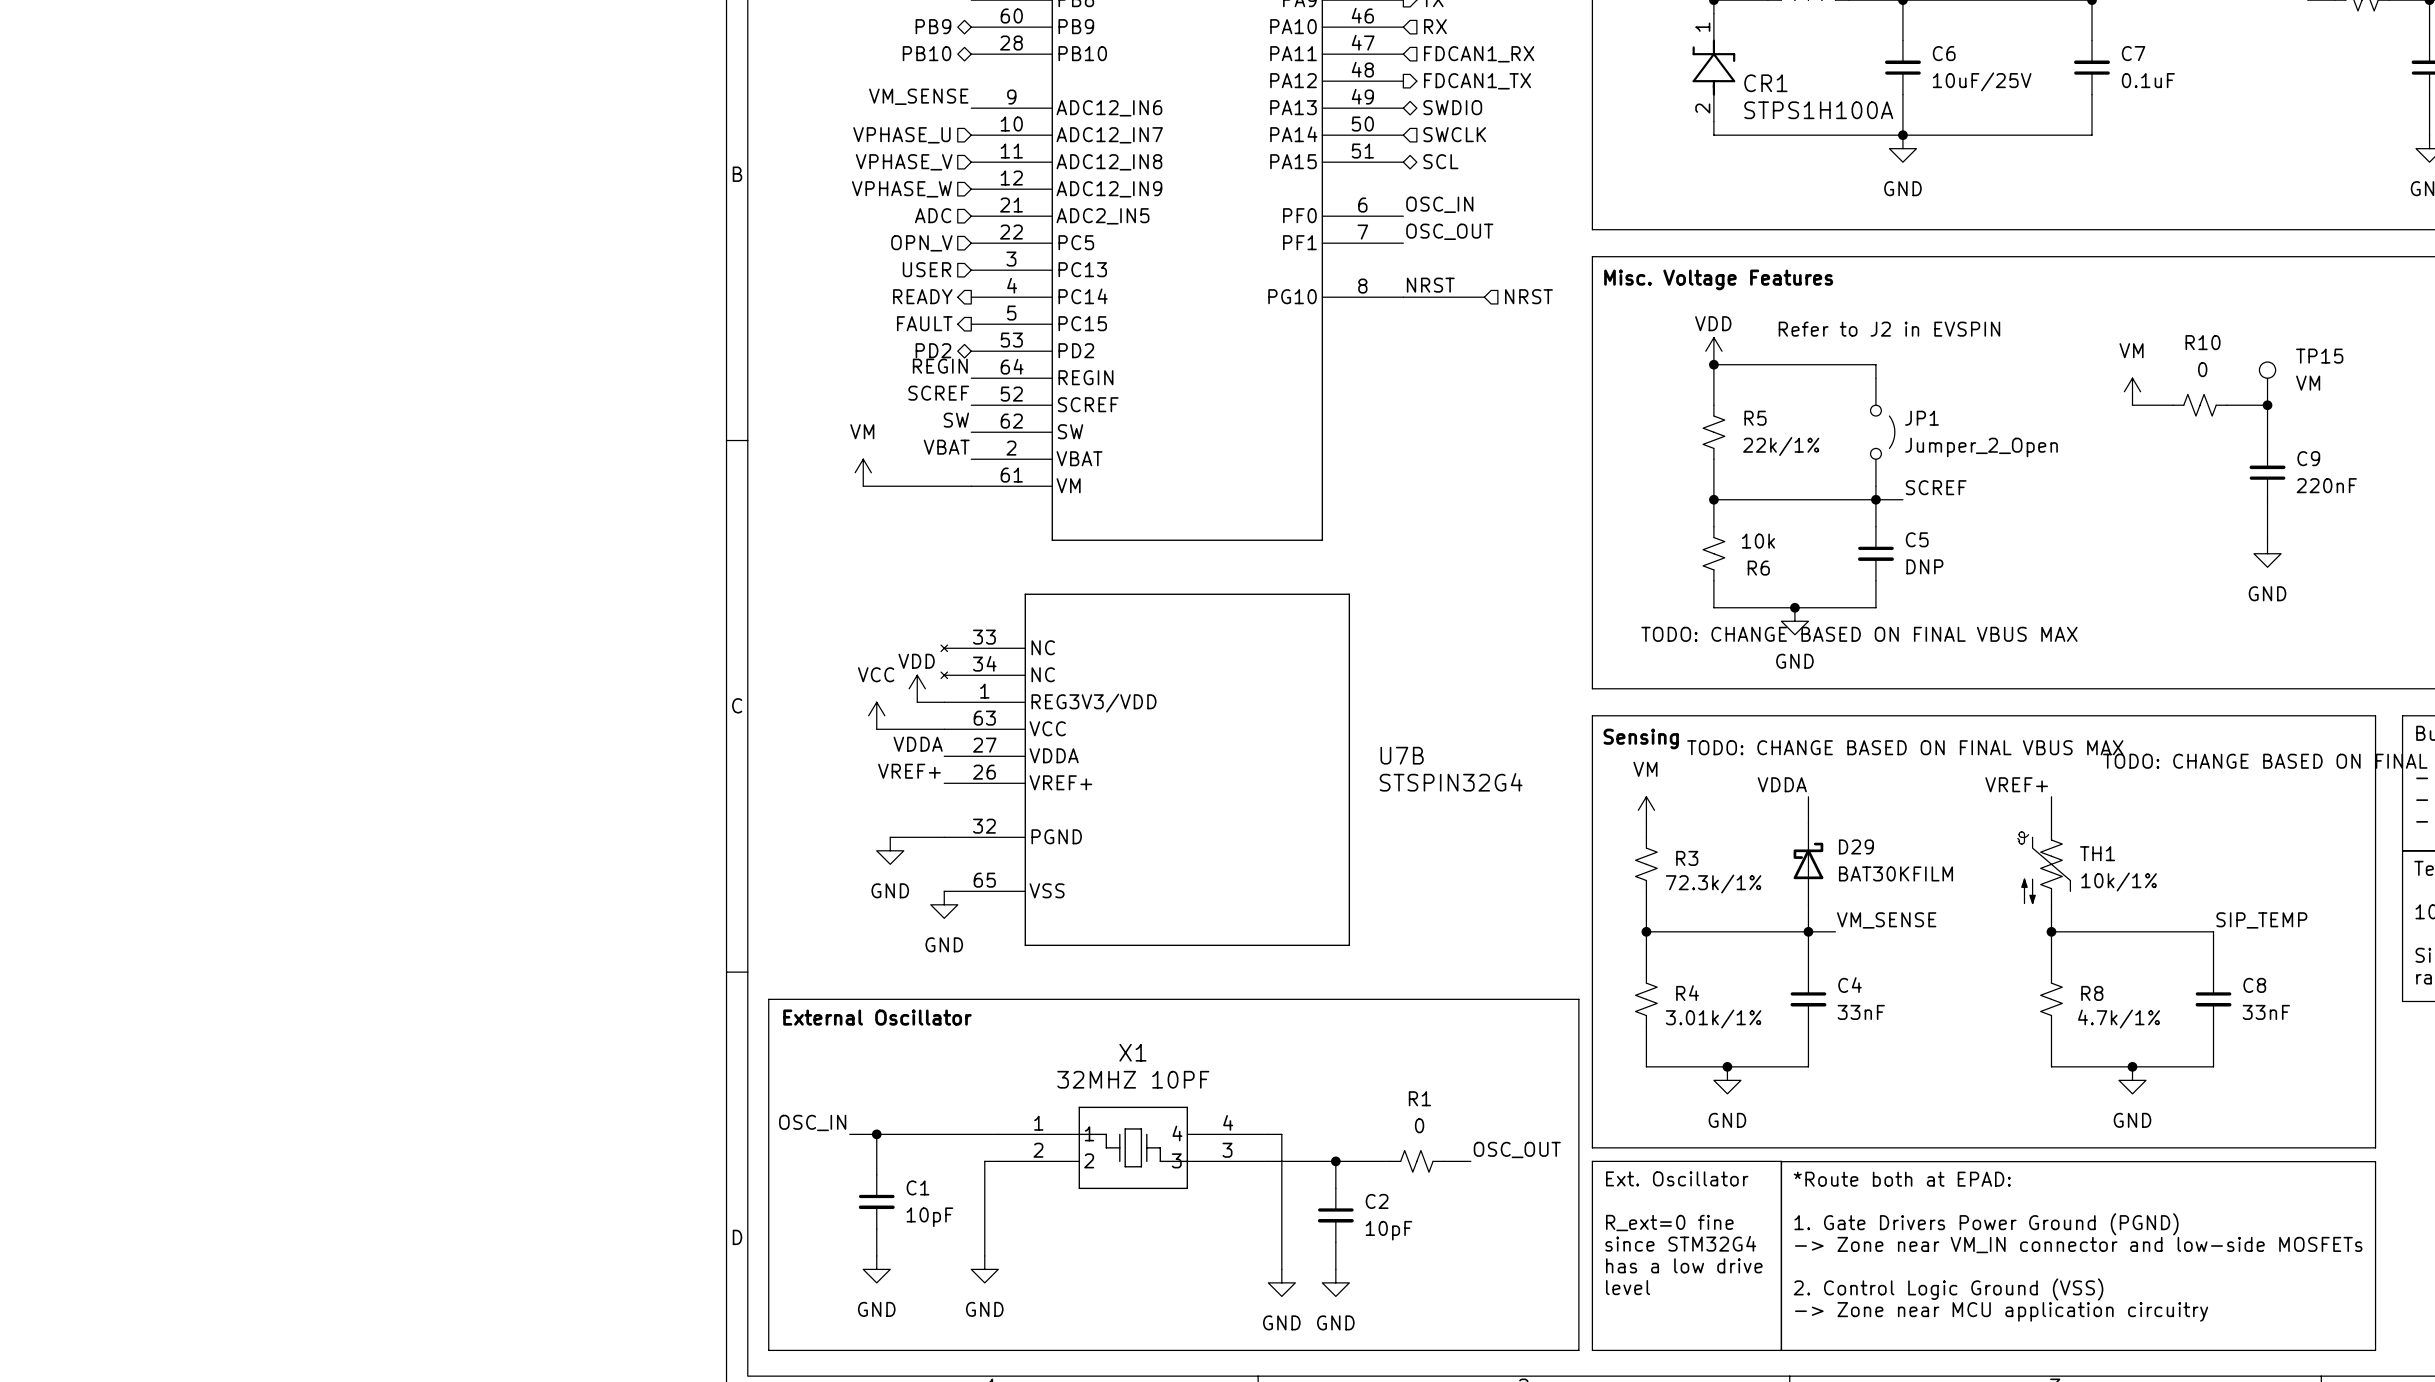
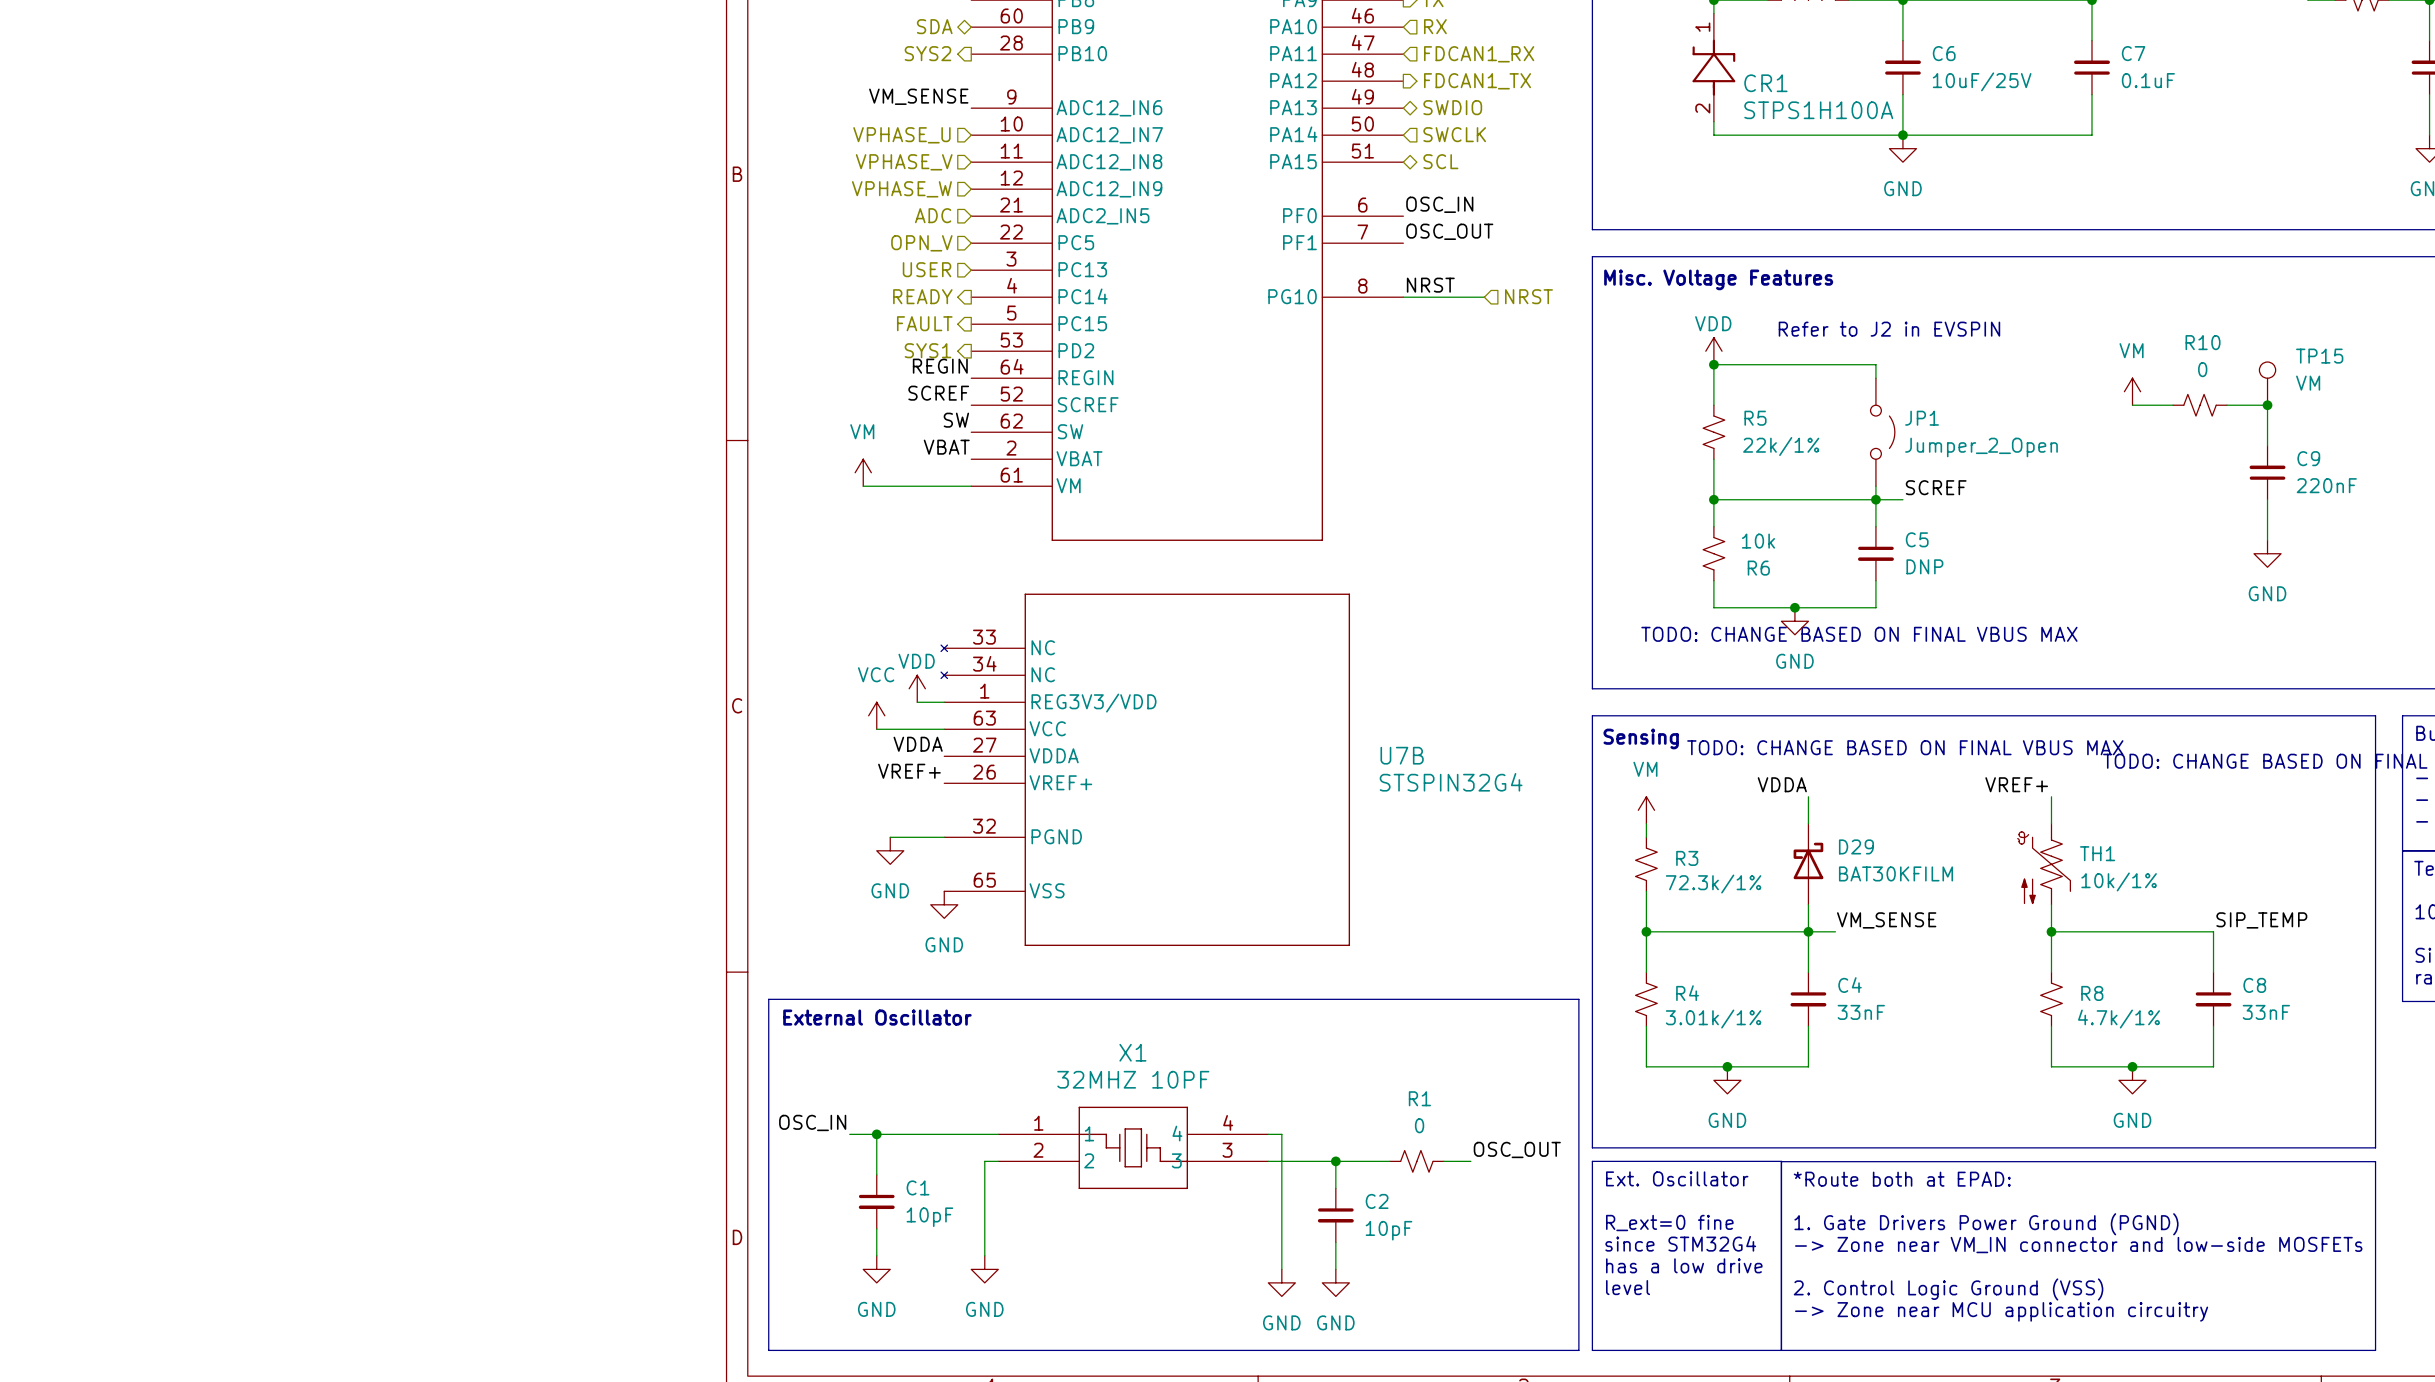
hierarchical label: PB9 (933, 26) -> SDA (934, 26)
hierarchical label shape: bidirectional (927, 53) -> output (927, 53)
hierarchical label: PB10 (927, 53) -> SYS2 (927, 53)
hierarchical label shape: bidirectional (933, 350) -> output (927, 350)
hierarchical label: PD2 (933, 350) -> SYS1 (927, 350)

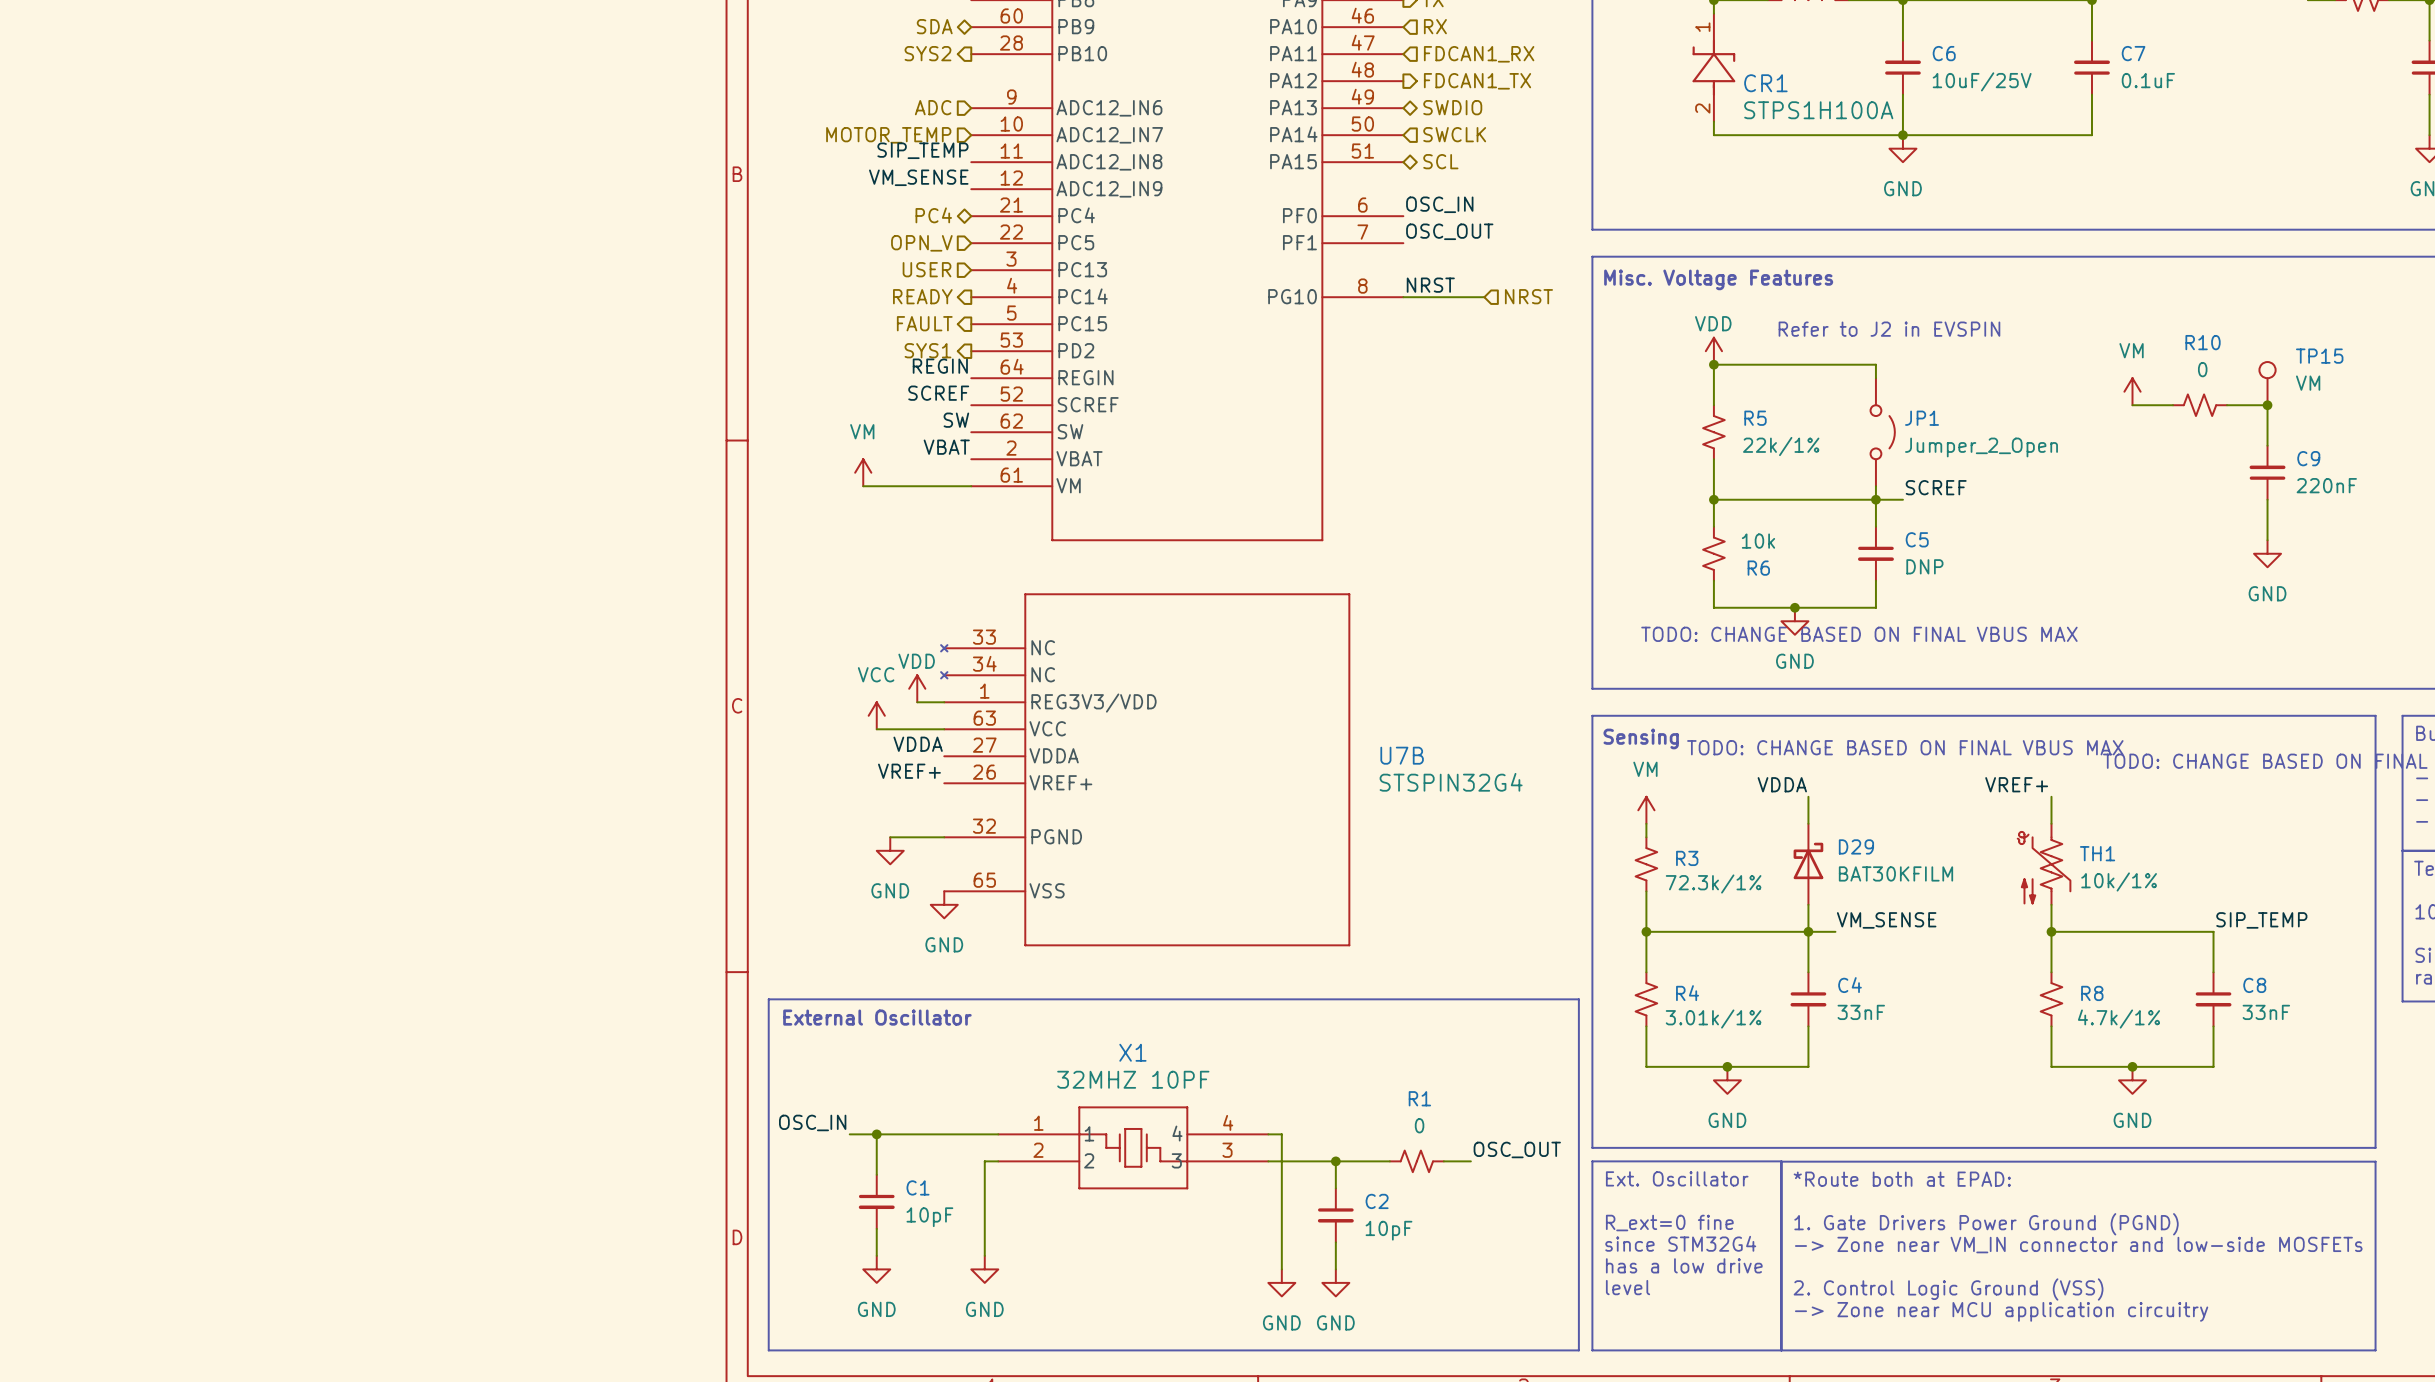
label position: VM_SENSE (918, 96) -> VM_SENSE (918, 177)
hierarchical label: none -> ADC (933, 107)
hierarchical label: VPHASE_U (901, 135) -> MOTOR_TEMP (888, 135)
label: none -> SIP_TEMP (922, 150)
hierarchical label: VPHASE_V (904, 162) -> none
hierarchical label: VPHASE_W (901, 189) -> none
hierarchical label shape: input (933, 215) -> bidirectional (933, 215)
hierarchical label: ADC (933, 215) -> PC4 (933, 215)
part pin name: ADC2_IN5 (1102, 216) -> PC4 (1076, 215)

